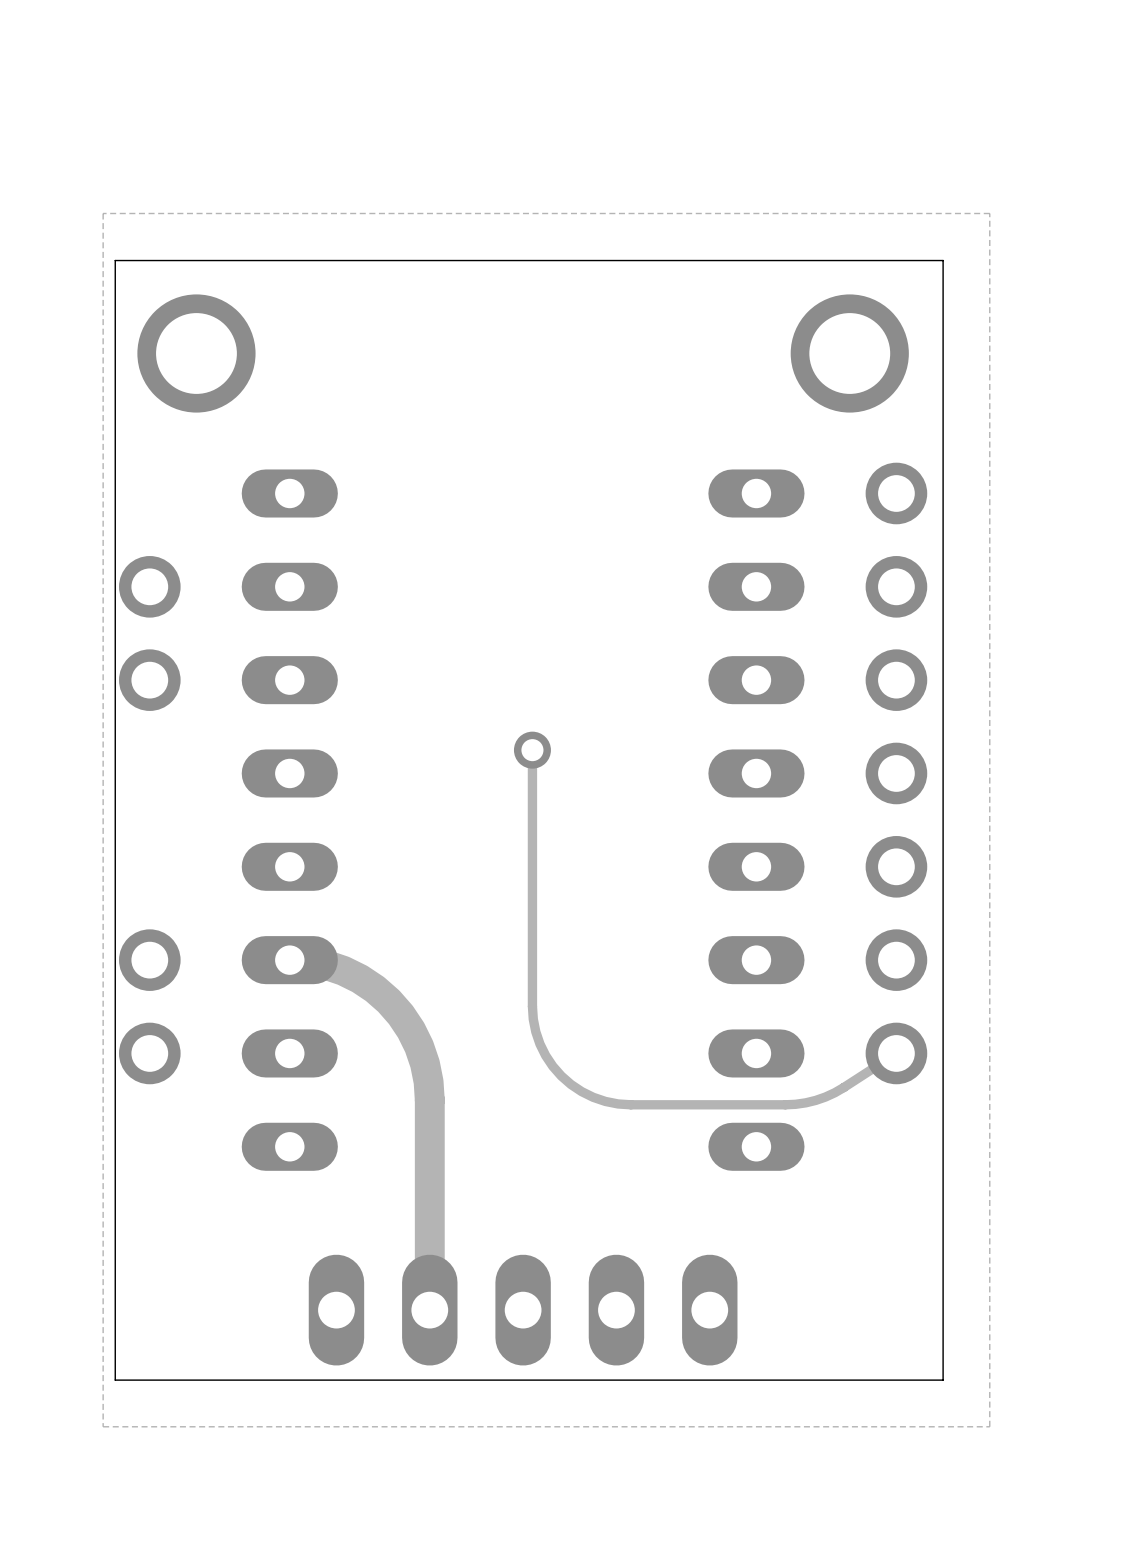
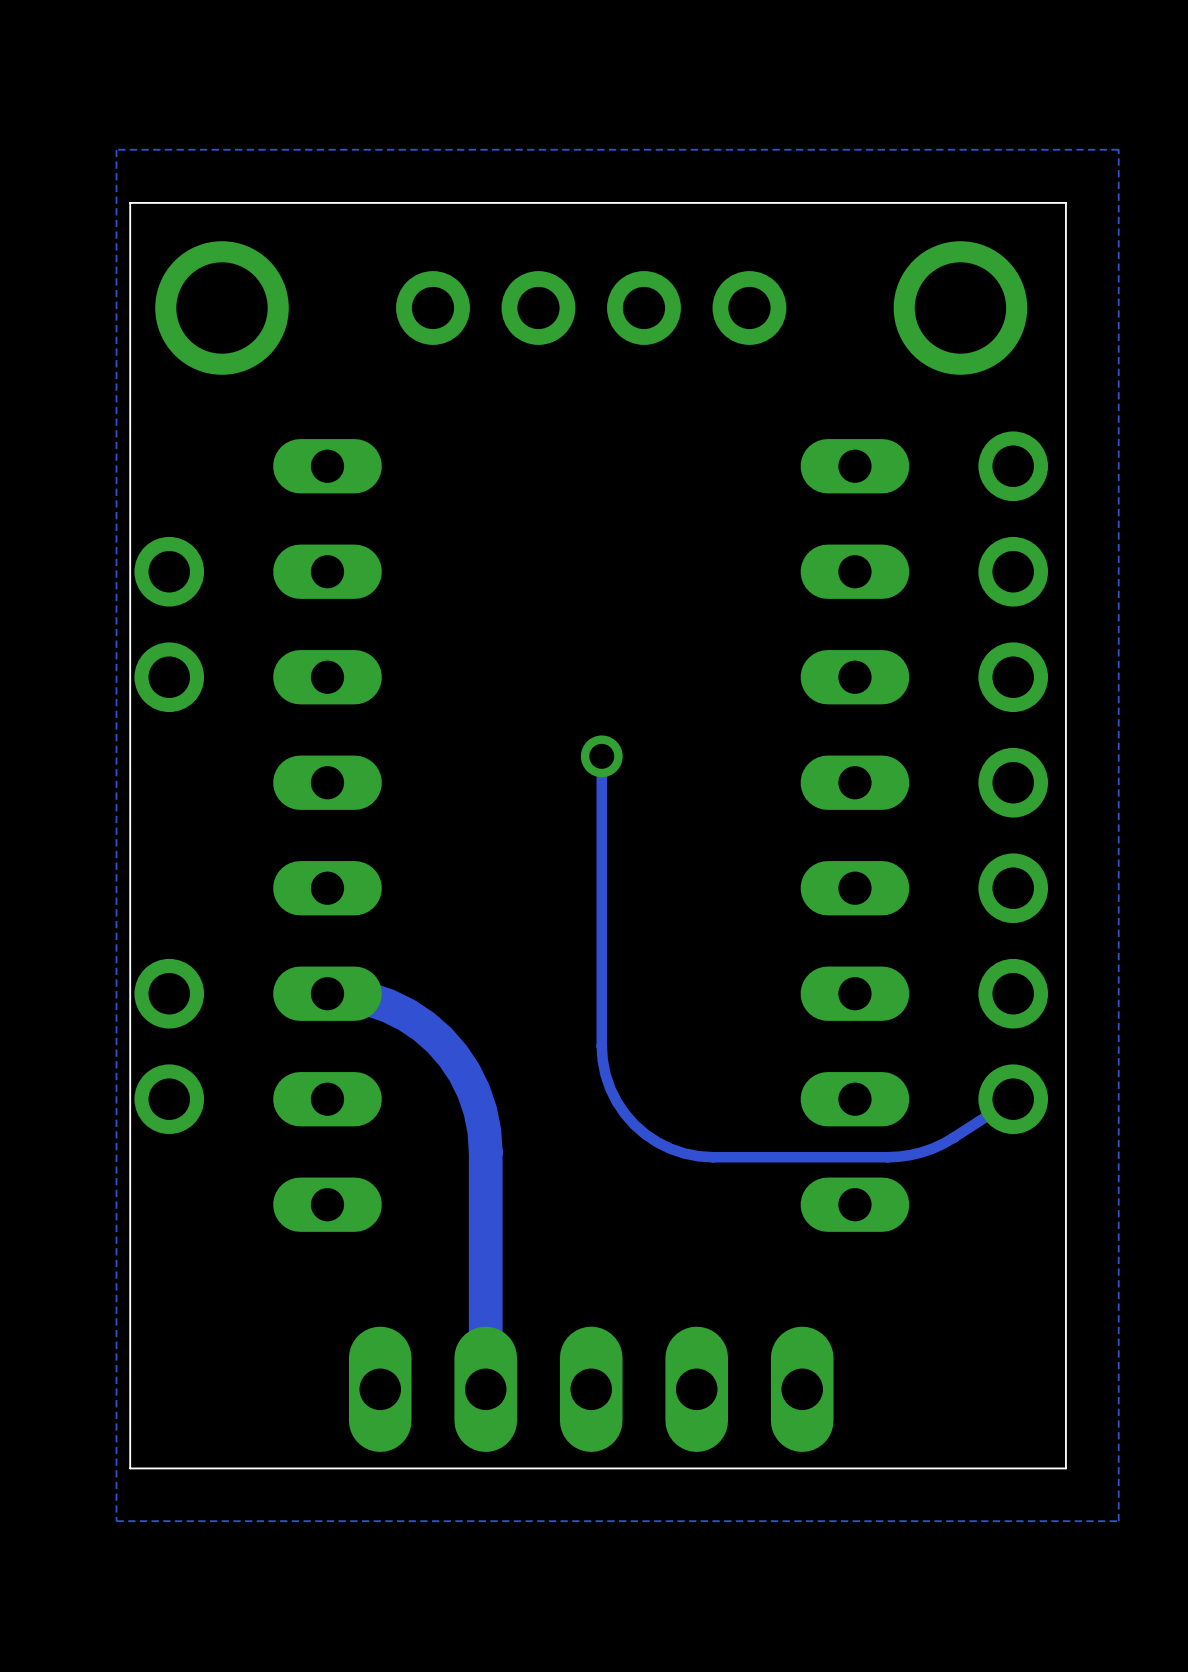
part: none -> (591, 308)

